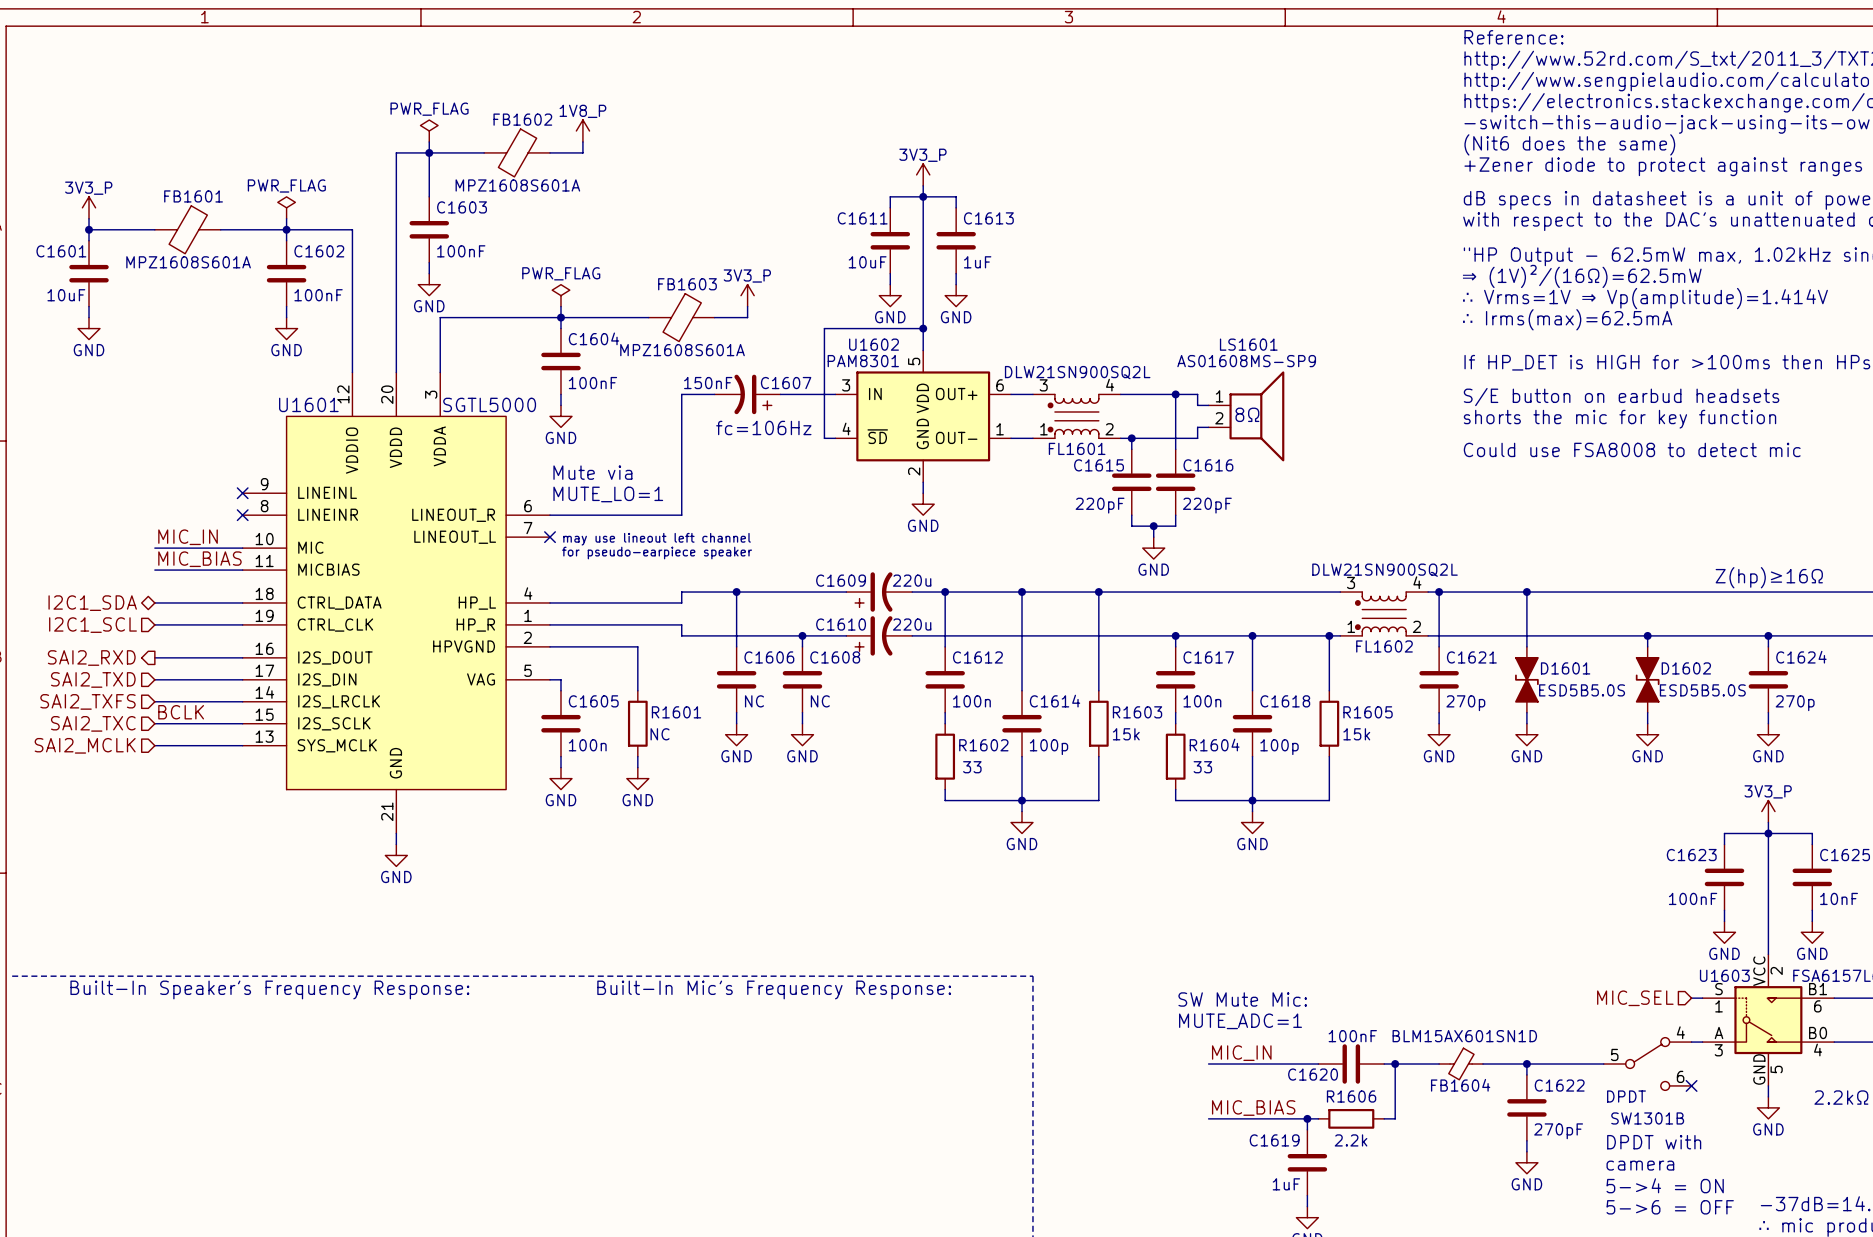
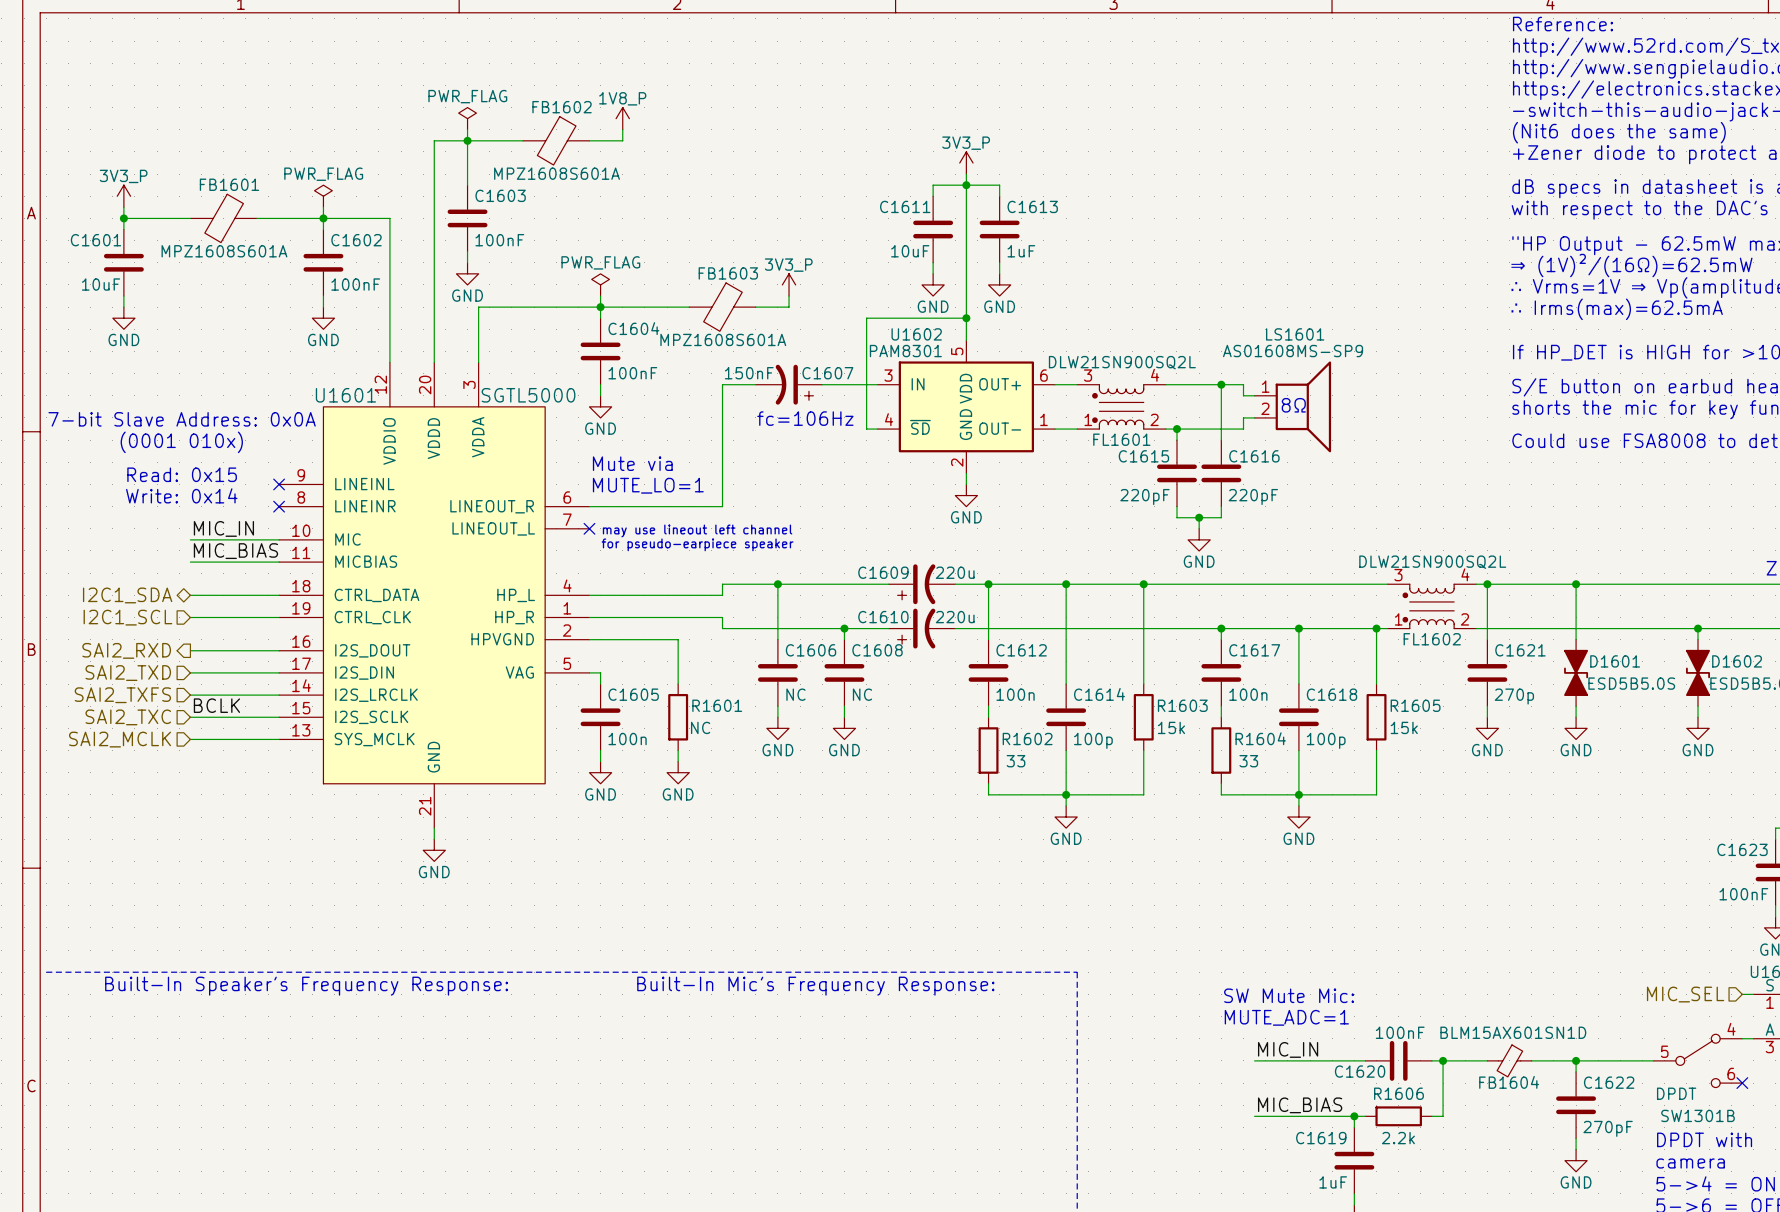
text: none -> 7-bit Slave Address: 0x0A (182, 419)
text: none -> (0001 010x) (181, 442)
text: none -> Read: 0x15 (182, 474)
text: none -> Write: 0x14 (181, 495)

